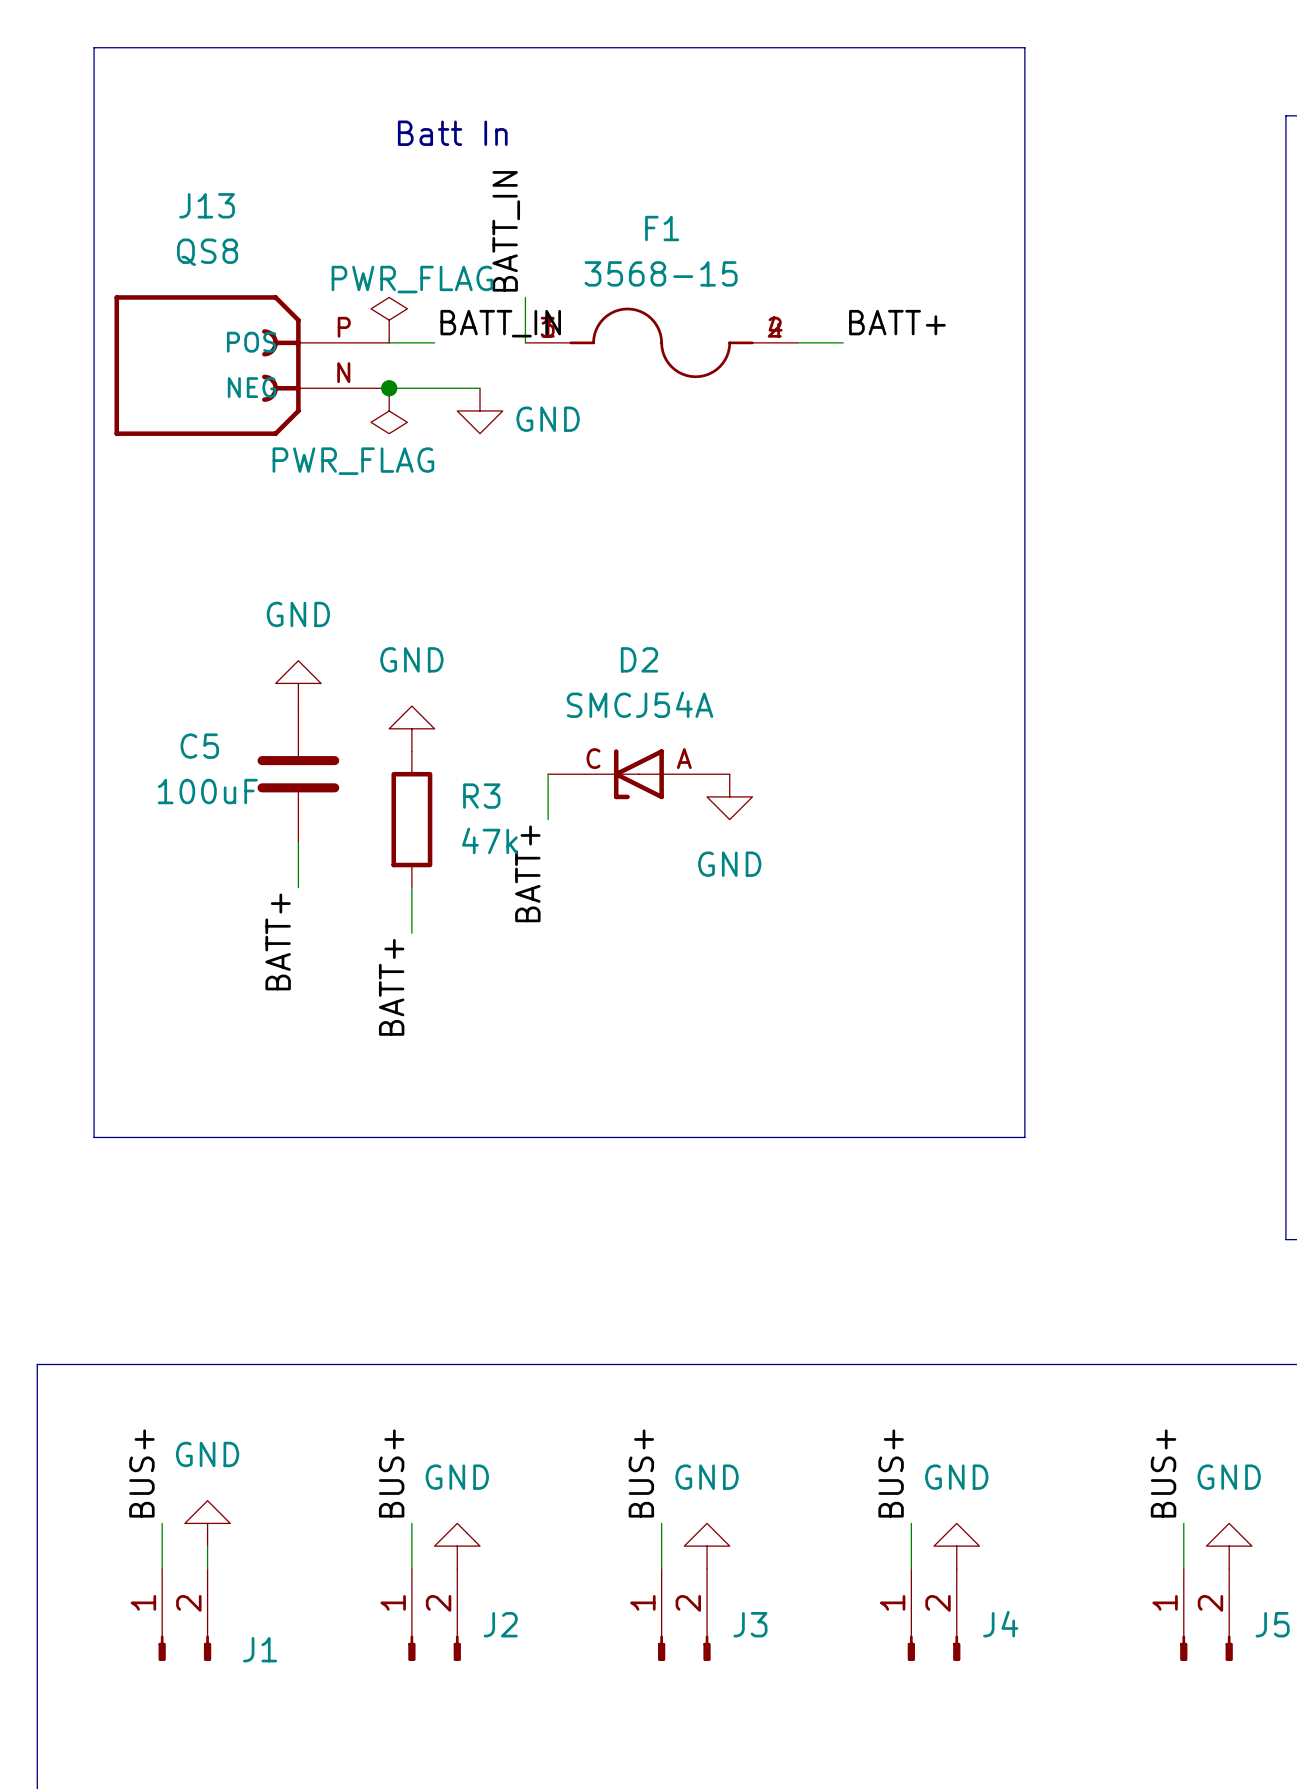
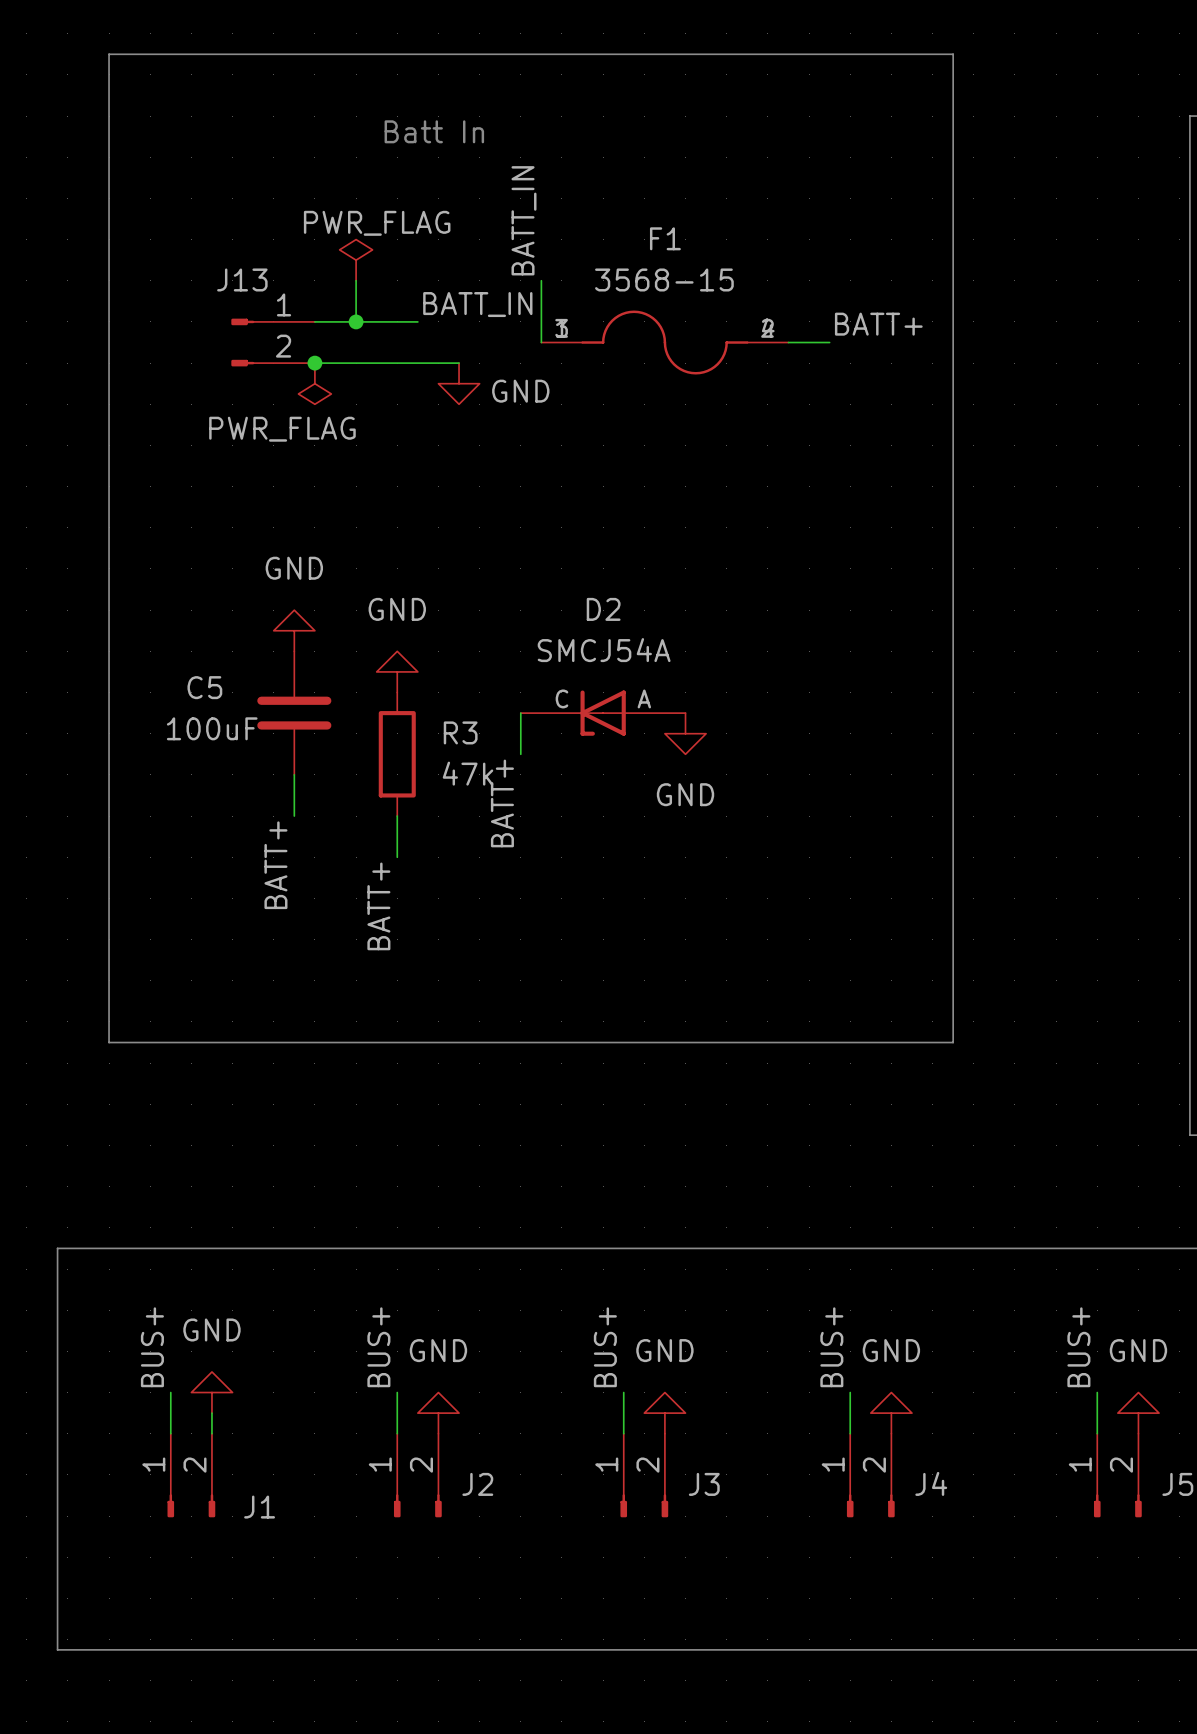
J13 name position: J13 (207, 205) -> J13 (242, 279)
label position: BATT_IN (506, 231) -> BATT_IN (523, 220)
J13 value: QS8 (207, 252) -> none
J13 symbol: [114, 295, 390, 436] -> [231, 318, 315, 367]
wire: (525, 297) (525, 342) -> (356, 280) (356, 321)
wire: none -> (541, 280) (541, 342)
power symbol position: PWR_FLAG (389, 320) -> PWR_FLAG (356, 260)
label position: BATT+ (897, 322) -> BATT+ (878, 324)
junction: none -> (356, 321)
F1 position: (661, 342) -> (664, 342)
wire: (797, 342) (843, 342) -> (788, 342) (829, 342)
junction: none -> (314, 363)
junction: (389, 388) -> none
power symbol: none -> PWR_FLAG (314, 383)
power symbol: PWR_FLAG (389, 410) -> none

